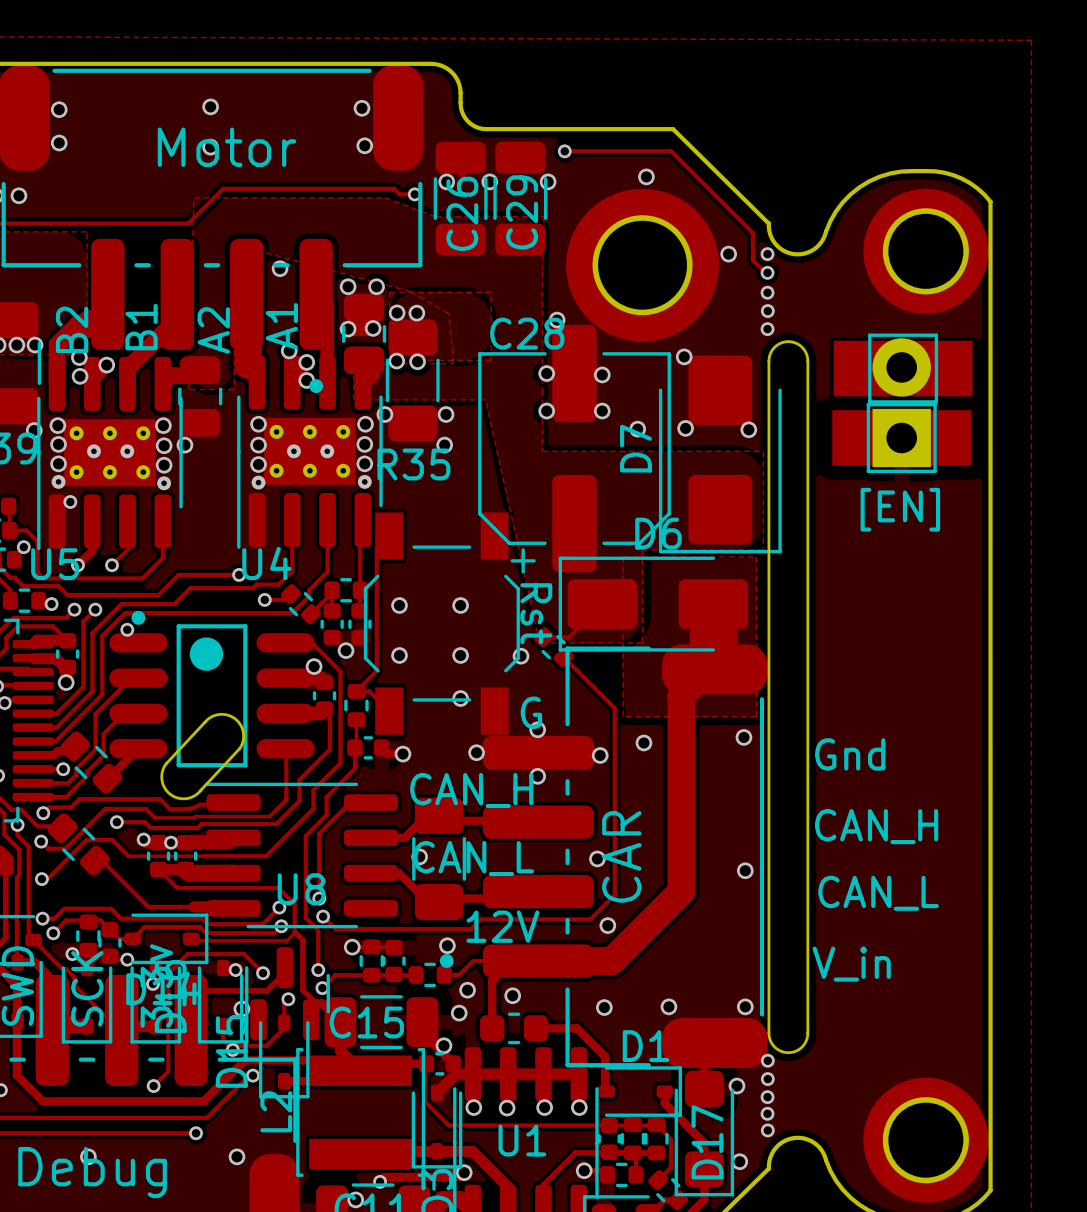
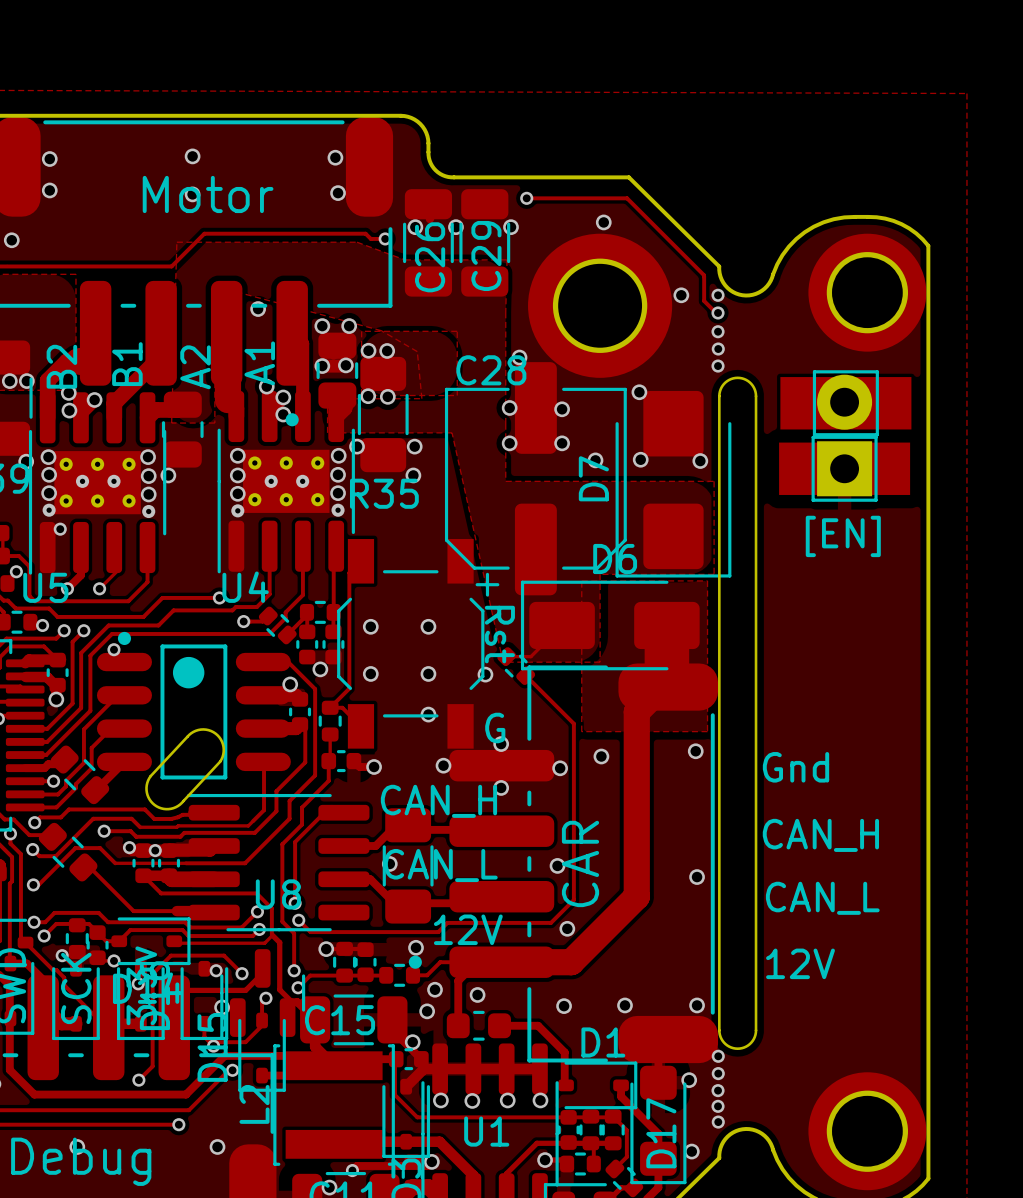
text: V_in (851, 964) -> 12V (800, 963)

